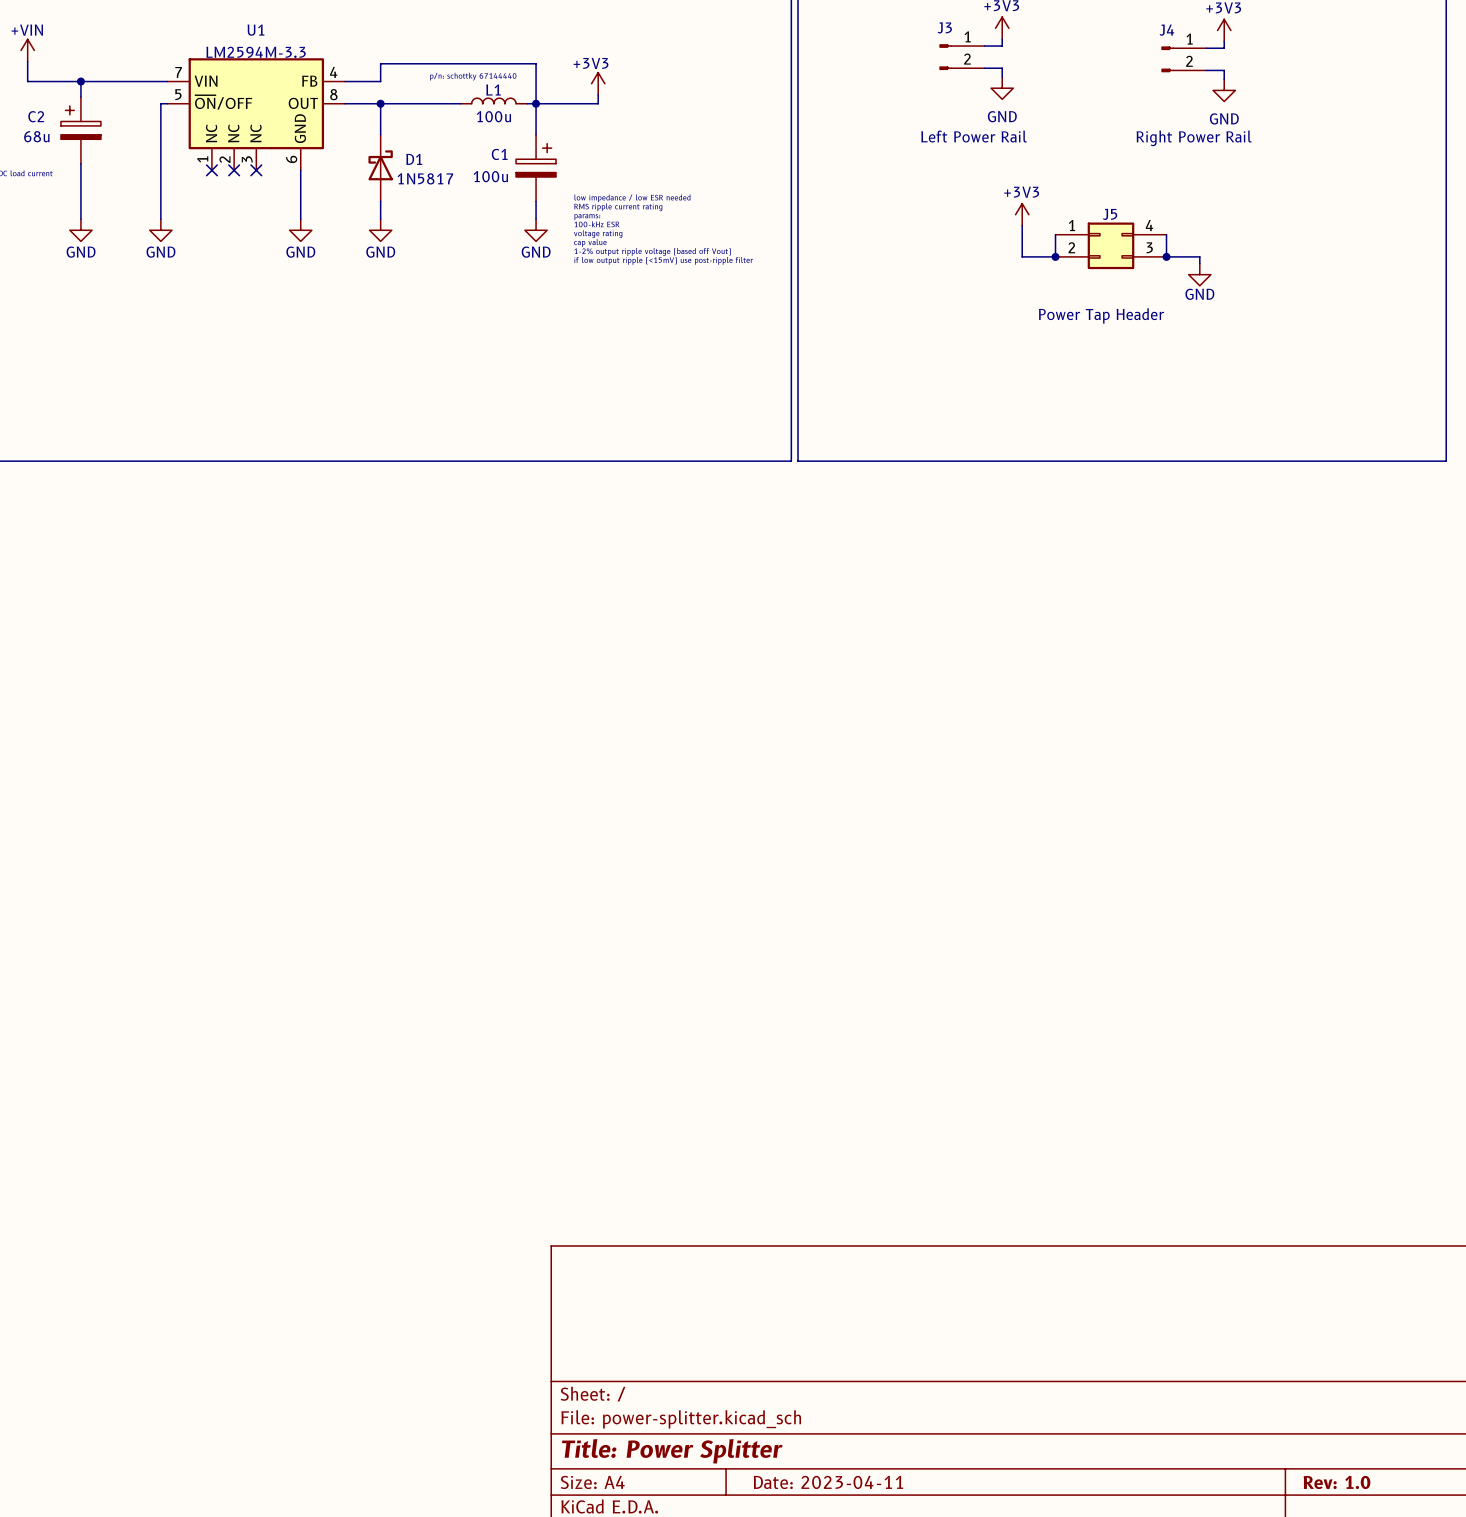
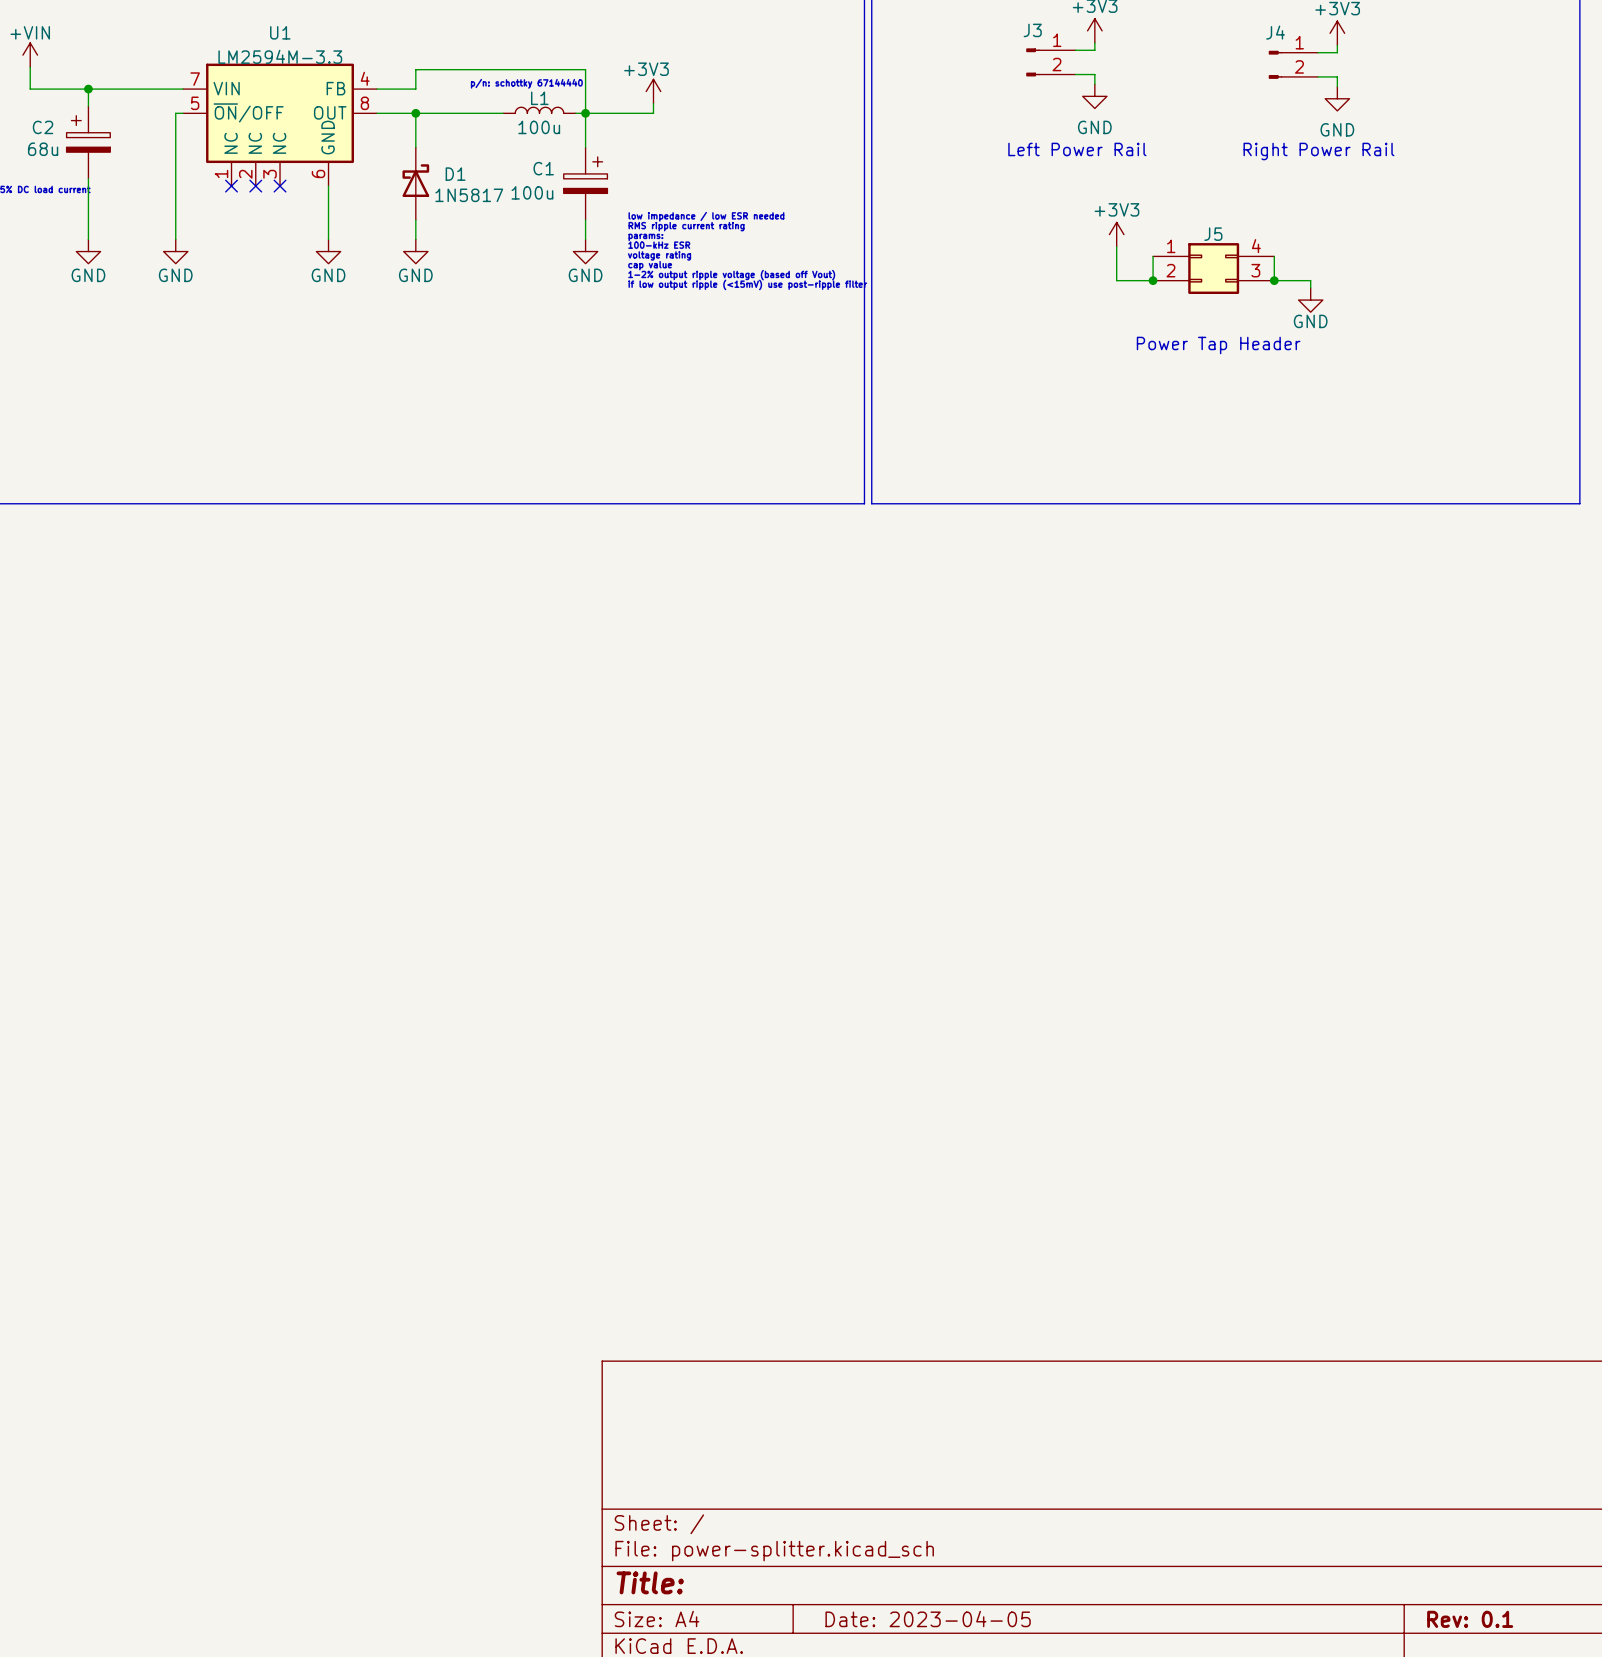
title block: Title: Power Splitter (672, 1451) -> Title: (650, 1582)
title block: Date: 2023-04-11 (828, 1482) -> Date: 2023-04-05 (928, 1619)
title block: Rev: 1.0 (1336, 1482) -> Rev: 0.1 (1470, 1619)

